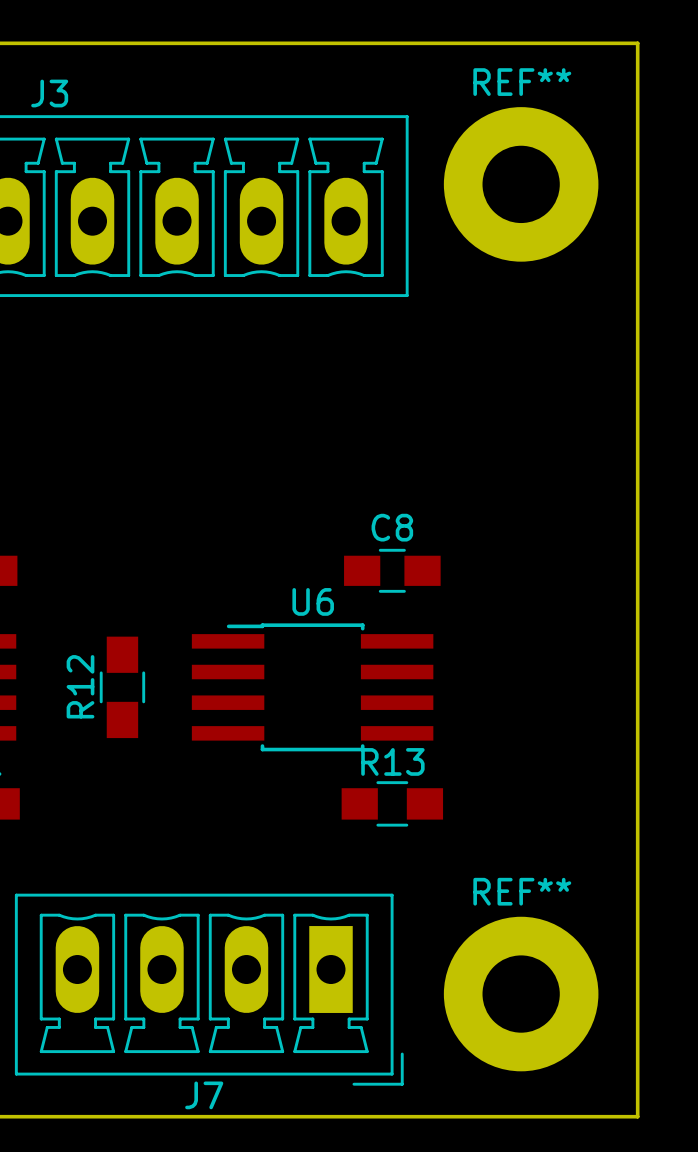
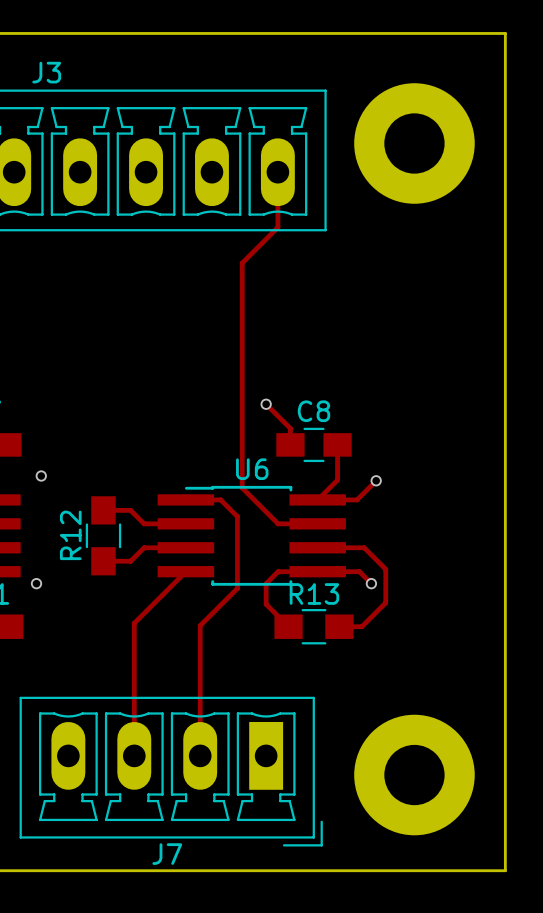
REF** name: REF** (522, 82) -> none
track: none -> (277, 172) (277, 227) (242, 263) (242, 487) (278, 523) (317, 523)
track: none -> (266, 404) (290, 428) (290, 444)
via: none -> (266, 404)
track: none -> (337, 444) (337, 480) (317, 499) (357, 499) (376, 480)
via: none -> (41, 476)
via: none -> (376, 480)
track: none -> (185, 499) (220, 499) (237, 516) (237, 588) (200, 625) (200, 748)
track: none -> (103, 510) (130, 510) (144, 523) (185, 523)
track: none -> (185, 547) (144, 547) (130, 561) (103, 561)
track: none -> (317, 547) (364, 547) (385, 569) (385, 602) (361, 626) (339, 626)
track: none -> (185, 571) (134, 623) (134, 748)
via: none -> (36, 583)
track: none -> (371, 583) (359, 571) (278, 571) (266, 583) (266, 604) (288, 626)
via: none -> (371, 583)
REF** name: REF** (522, 891) -> none

